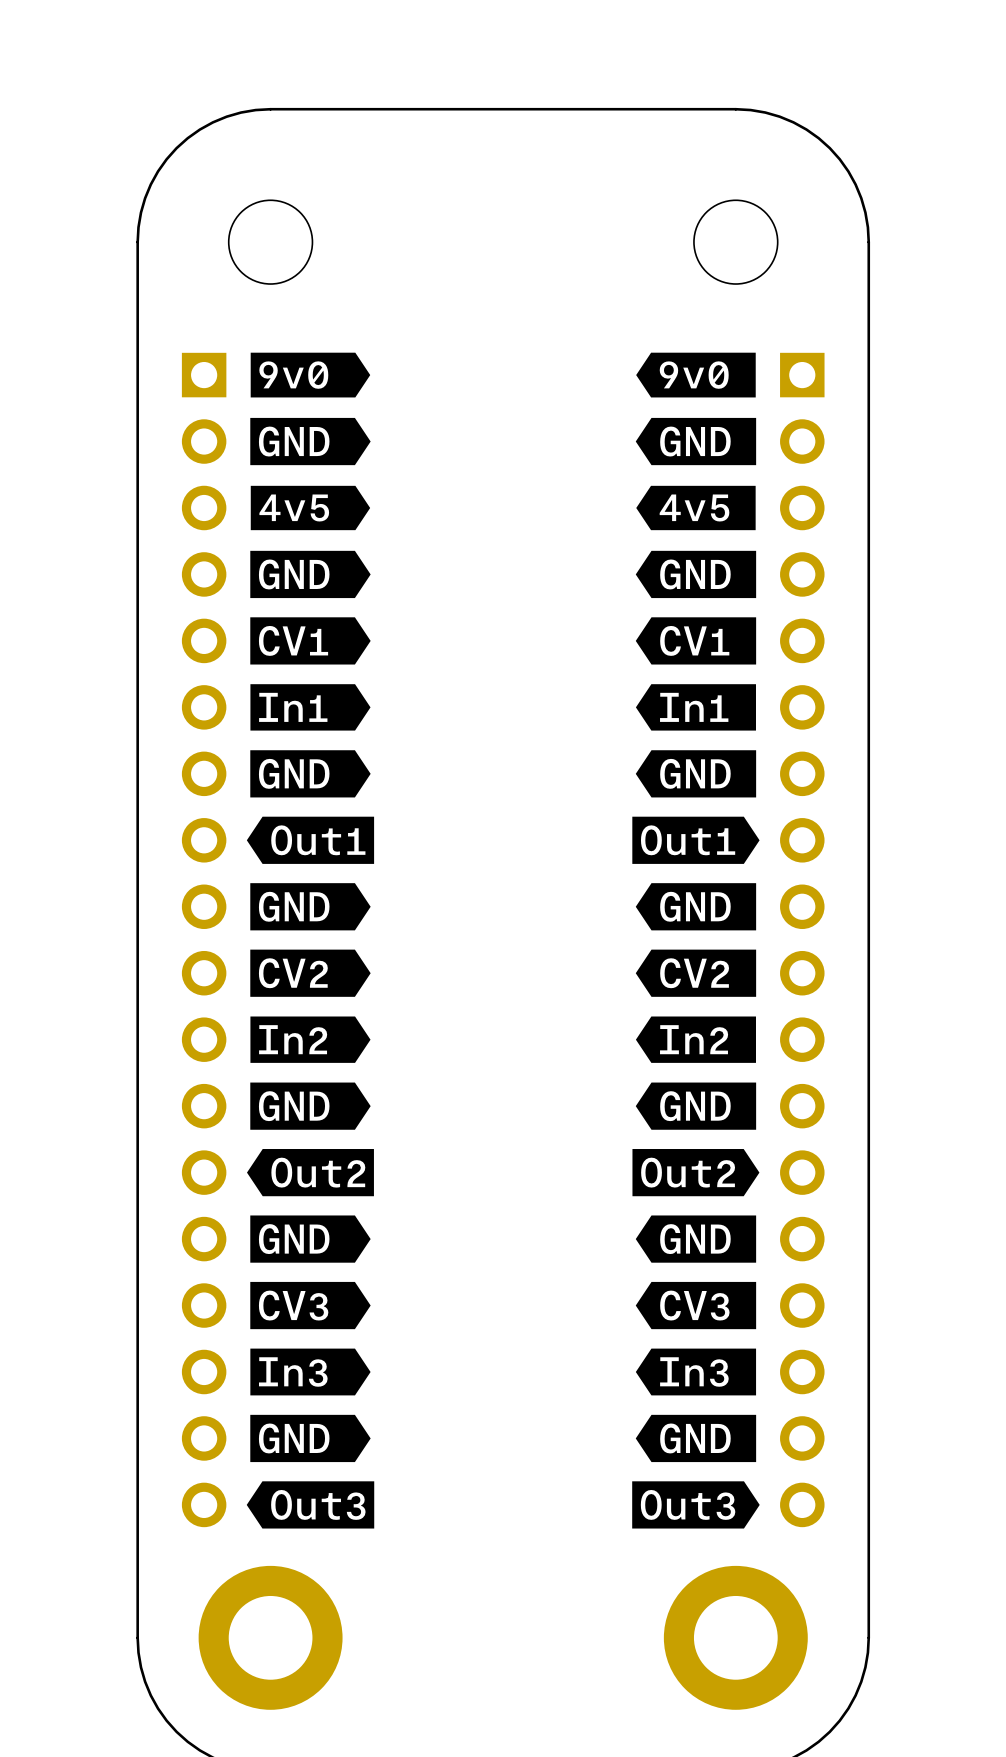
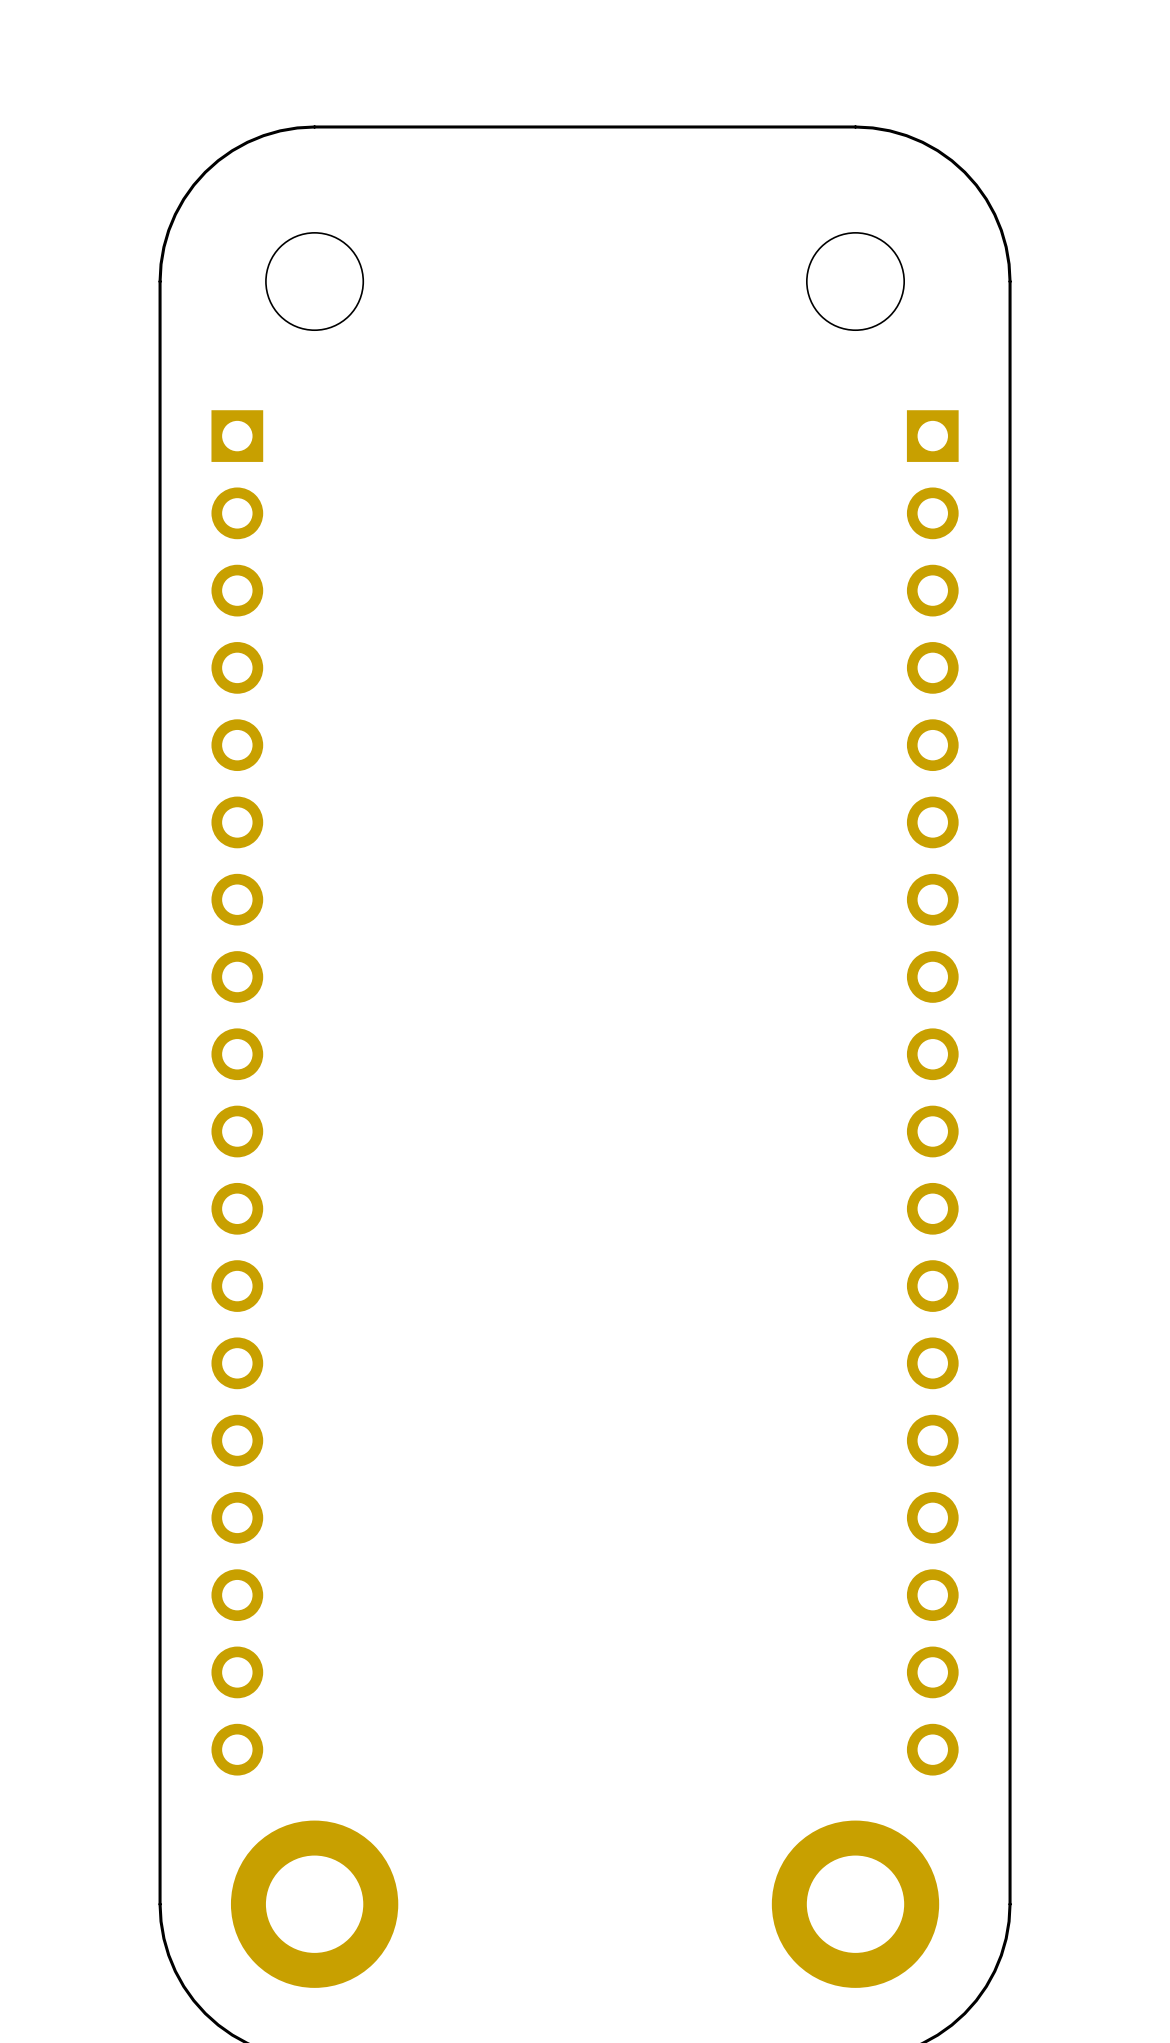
drawing: [246, 352, 375, 1529] -> none
drawing: [632, 352, 760, 1529] -> none

